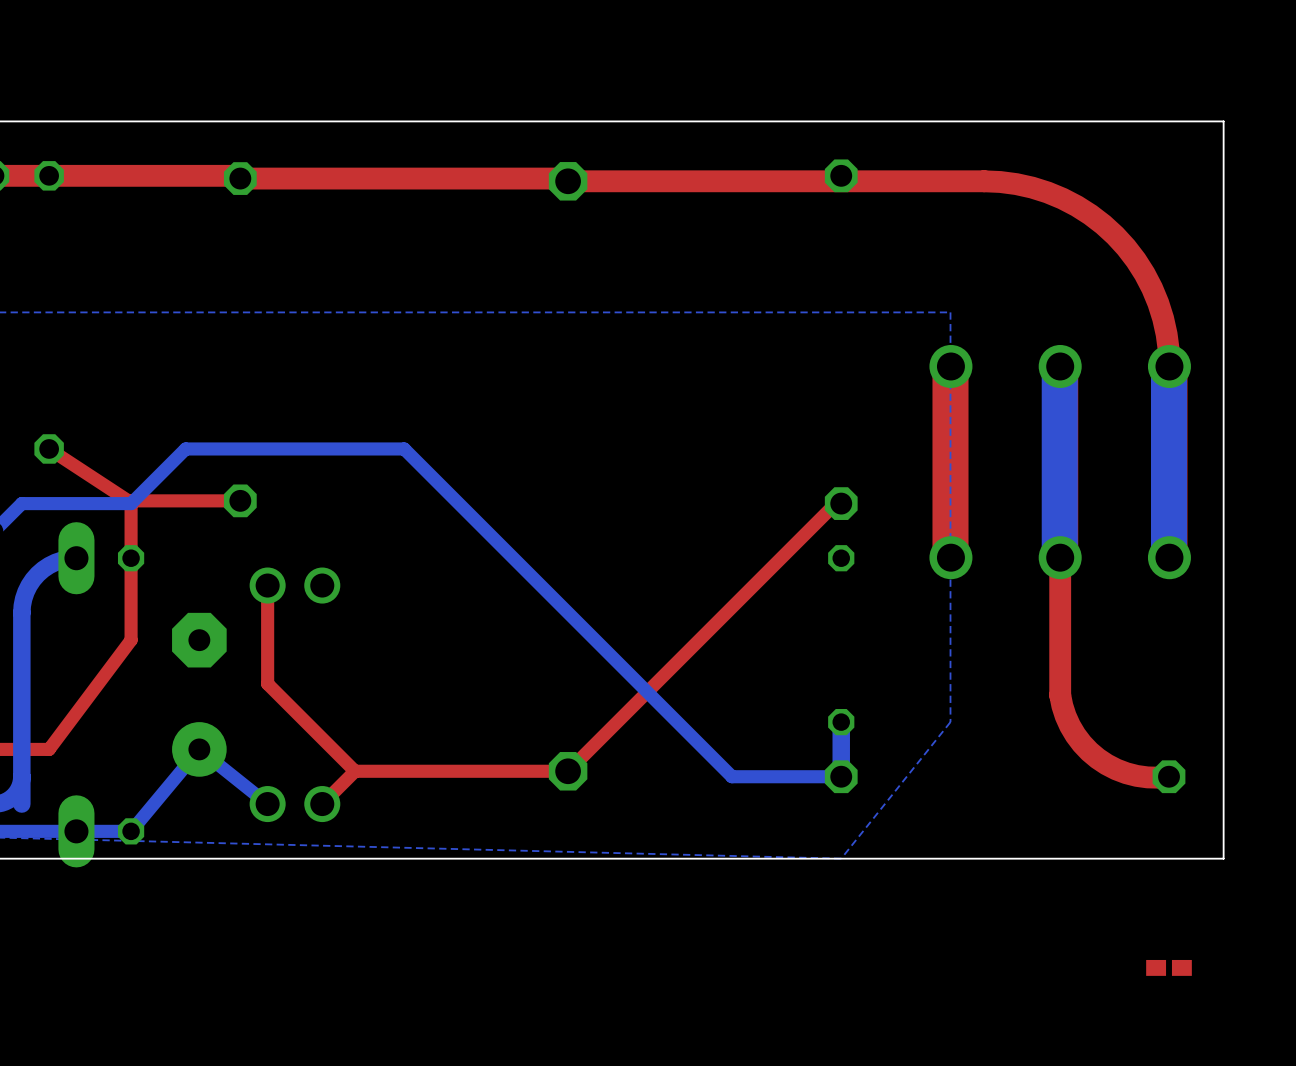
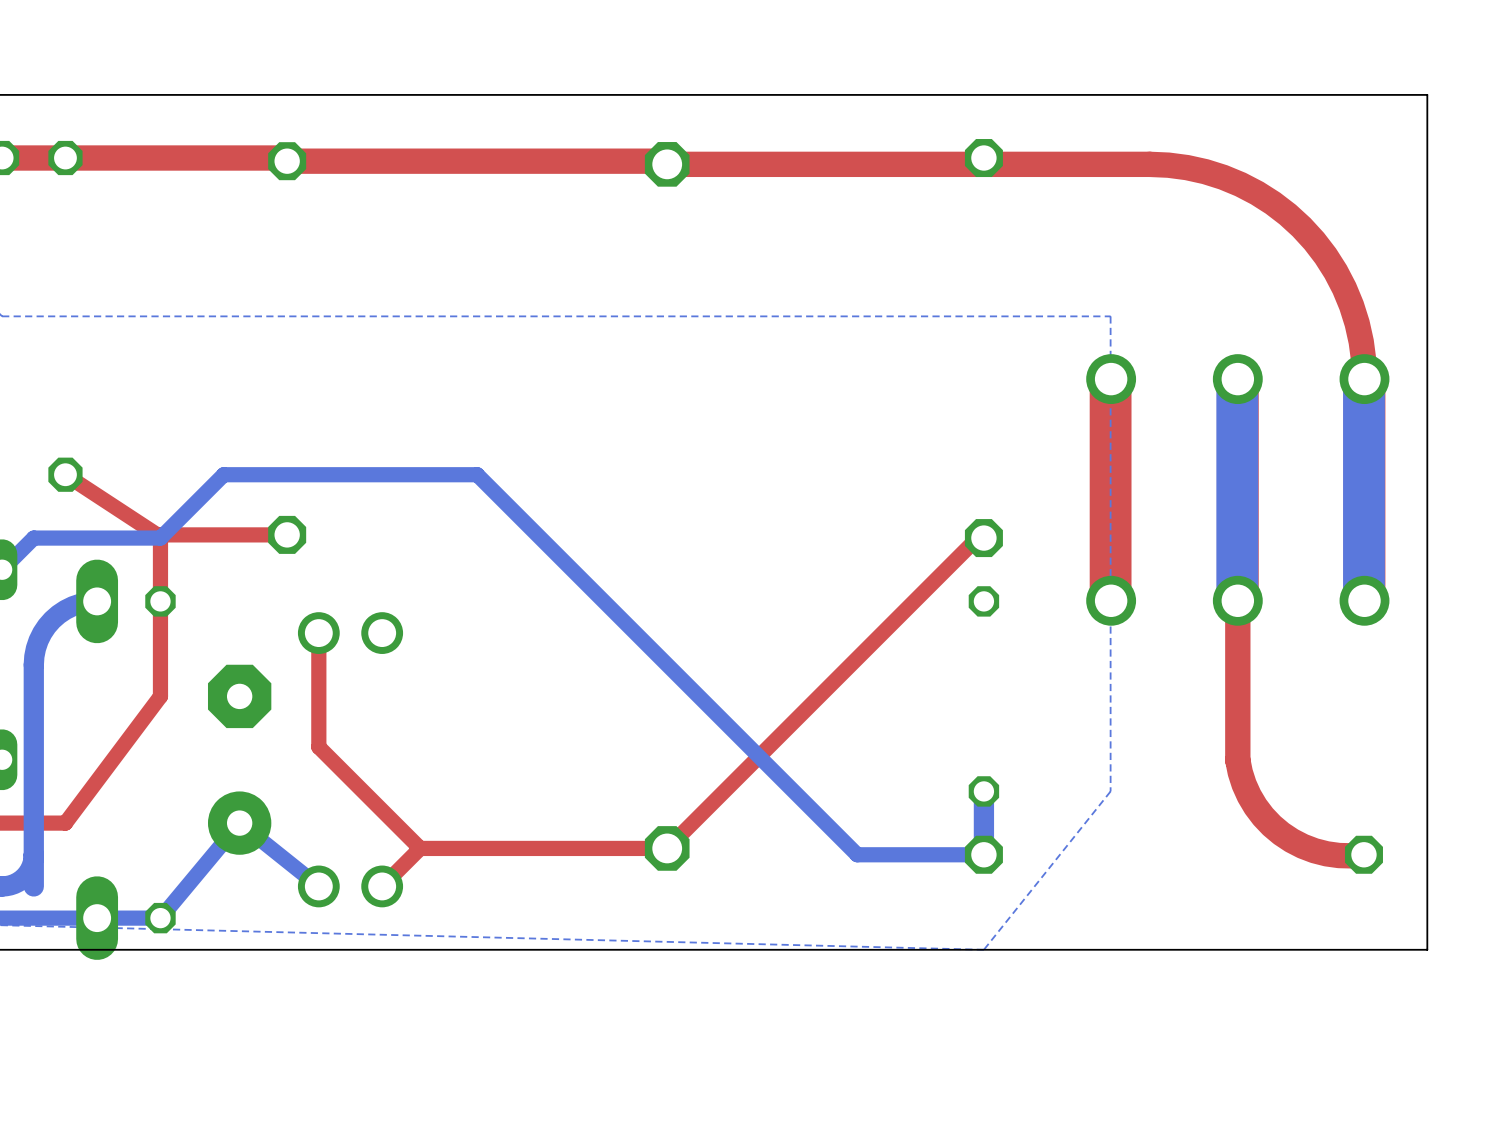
part: (1169, 967) -> none

